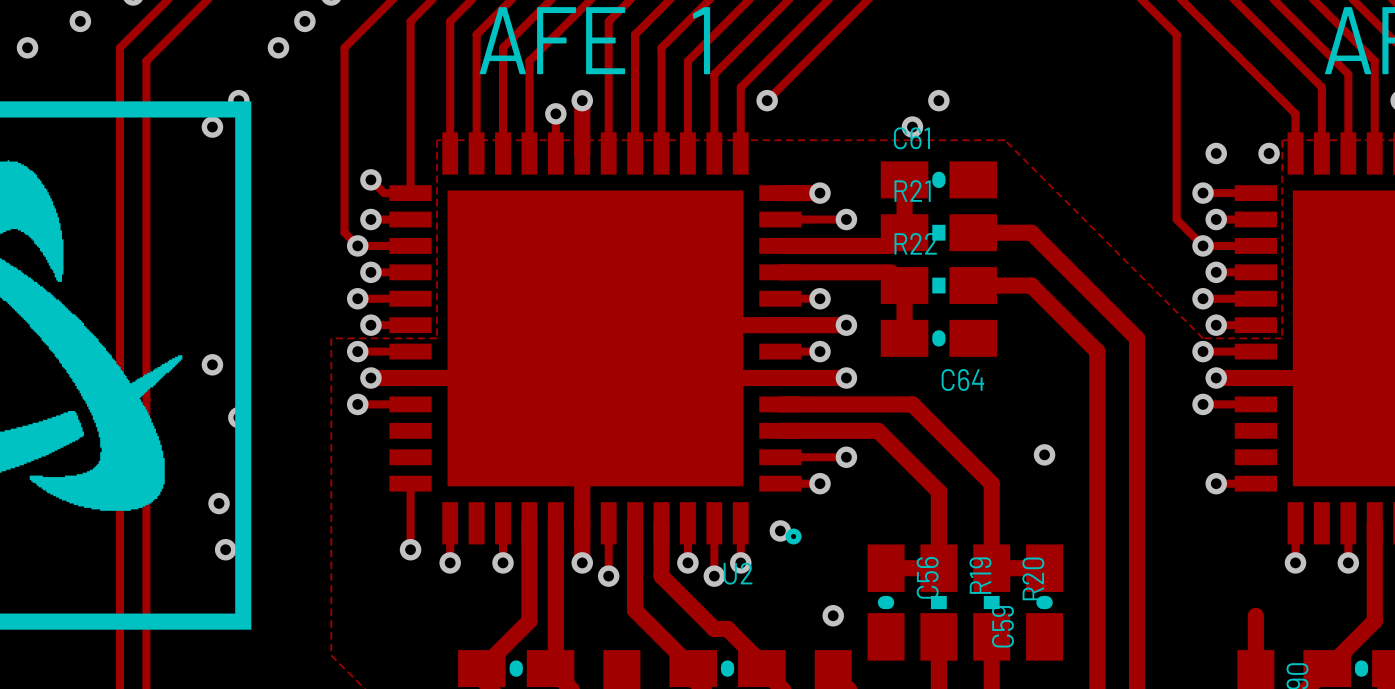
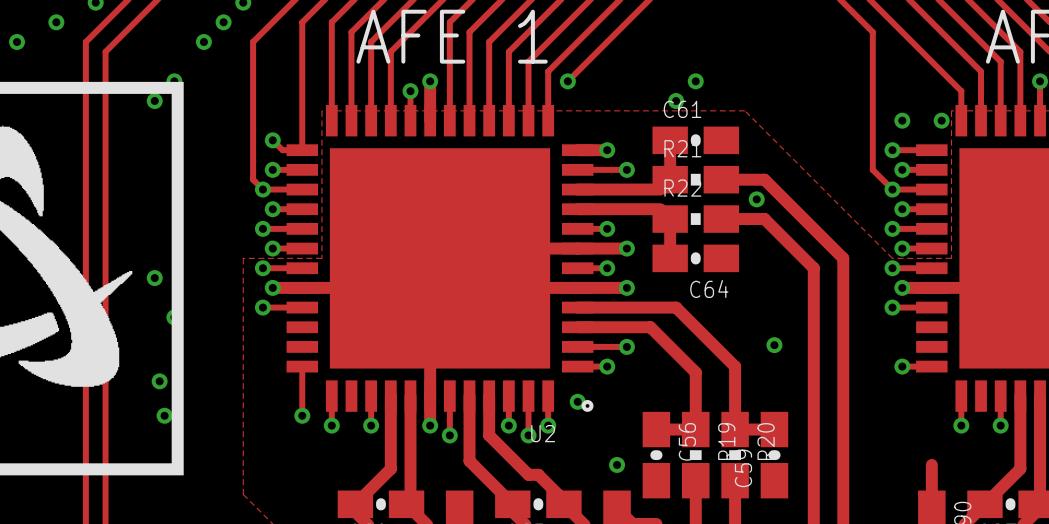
via: none -> (756, 199)

